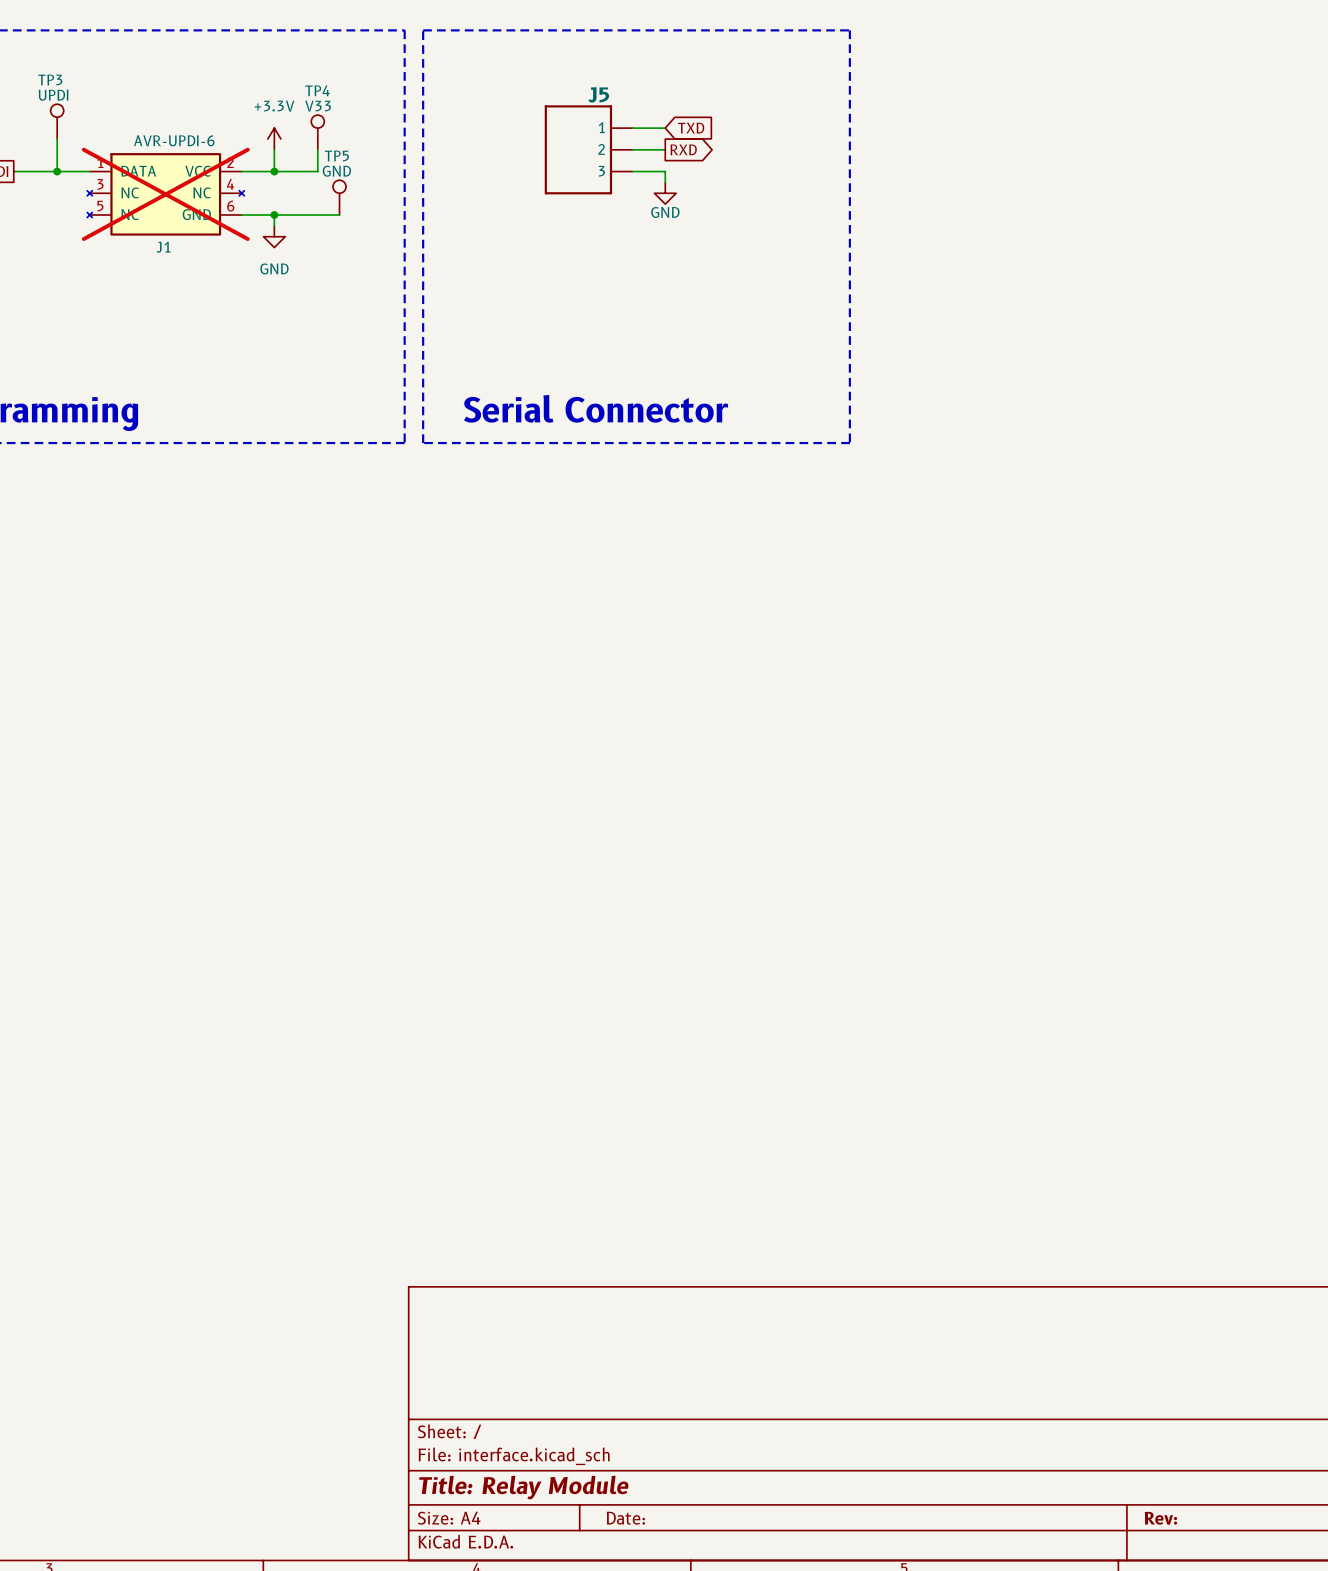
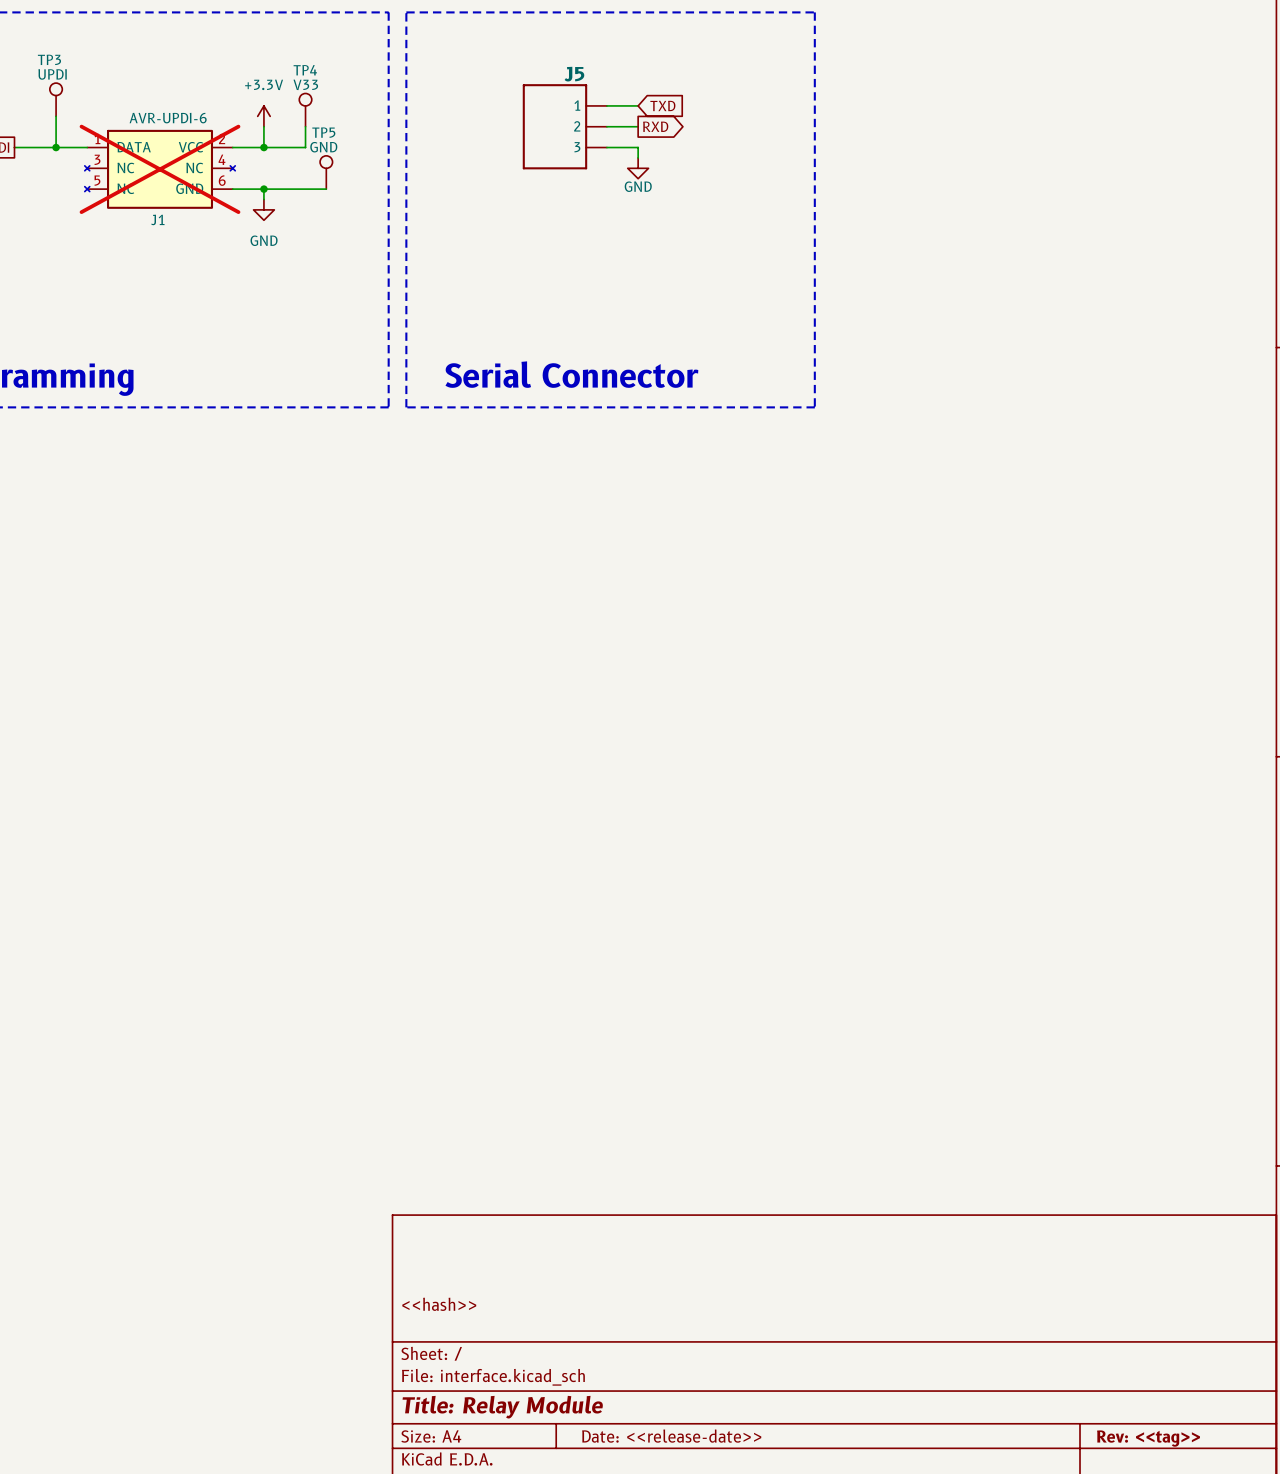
title block: none -> <<hash>> (439, 1304)
title block: Date: (625, 1518) -> Date: <<release-date>> (671, 1436)
title block: Rev: (1160, 1518) -> Rev: <<tag>> (1148, 1438)

